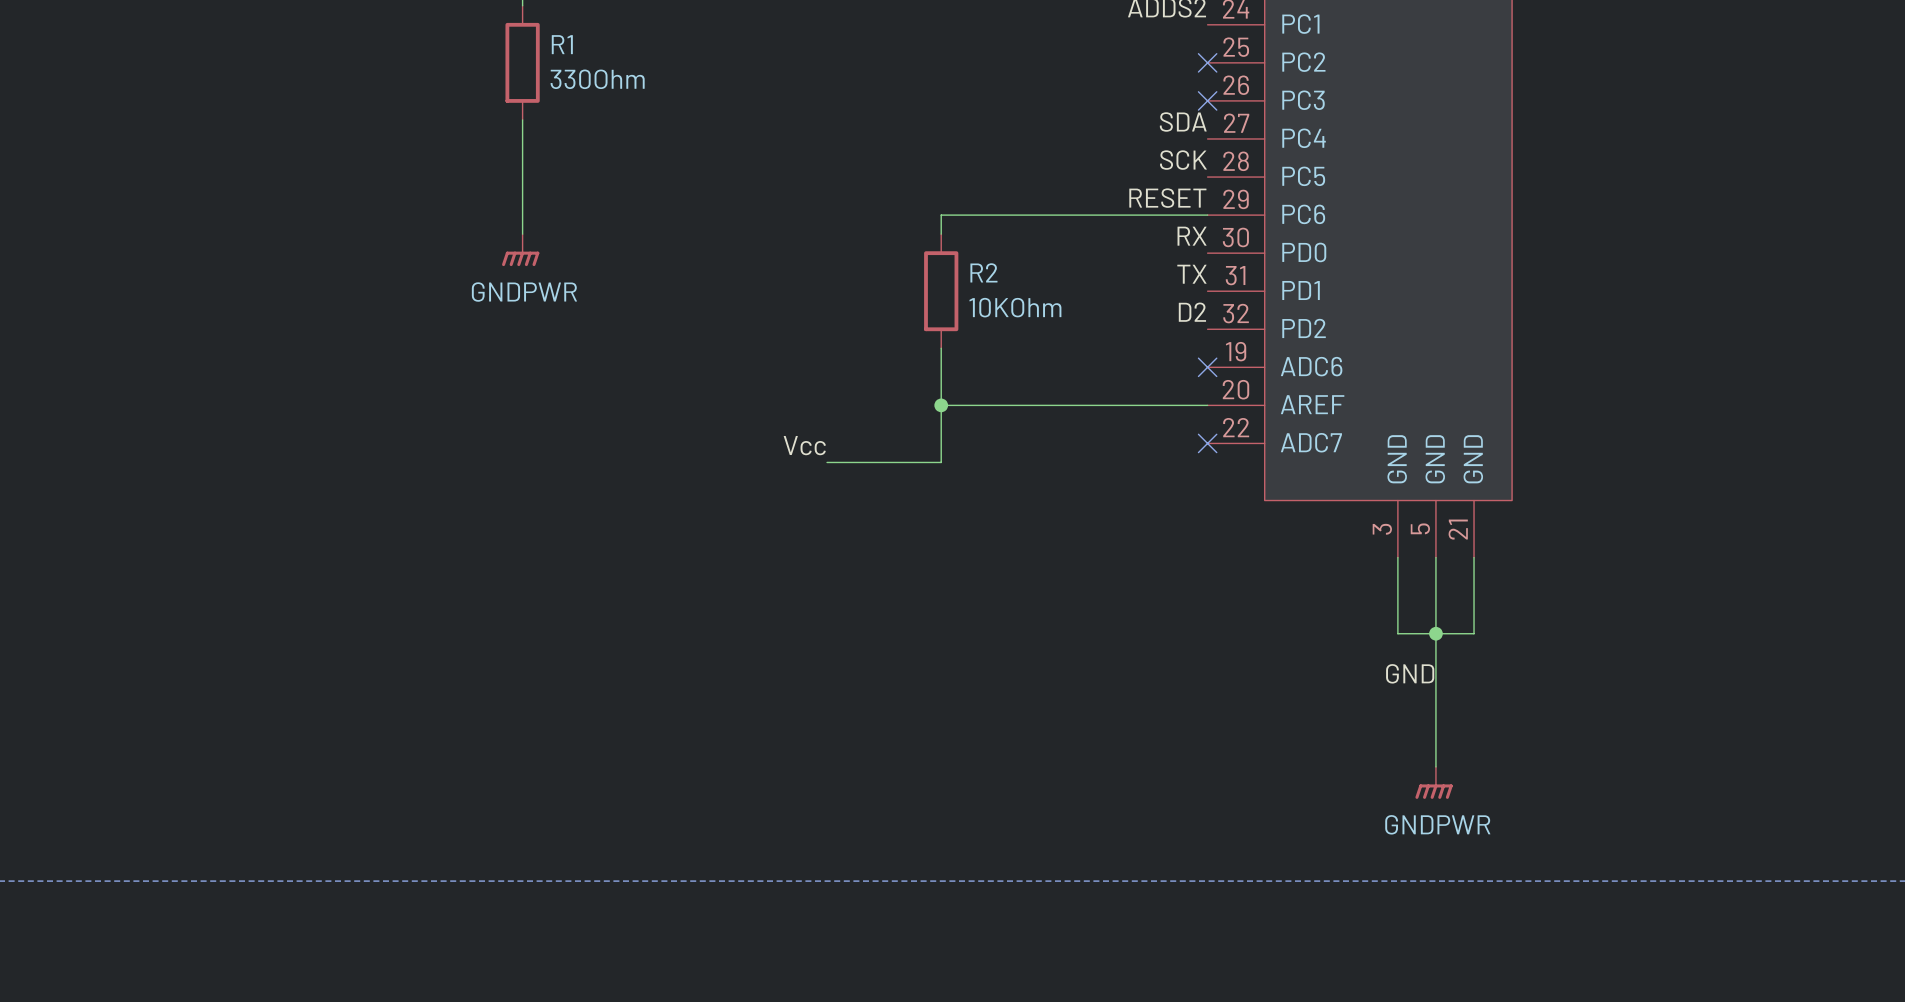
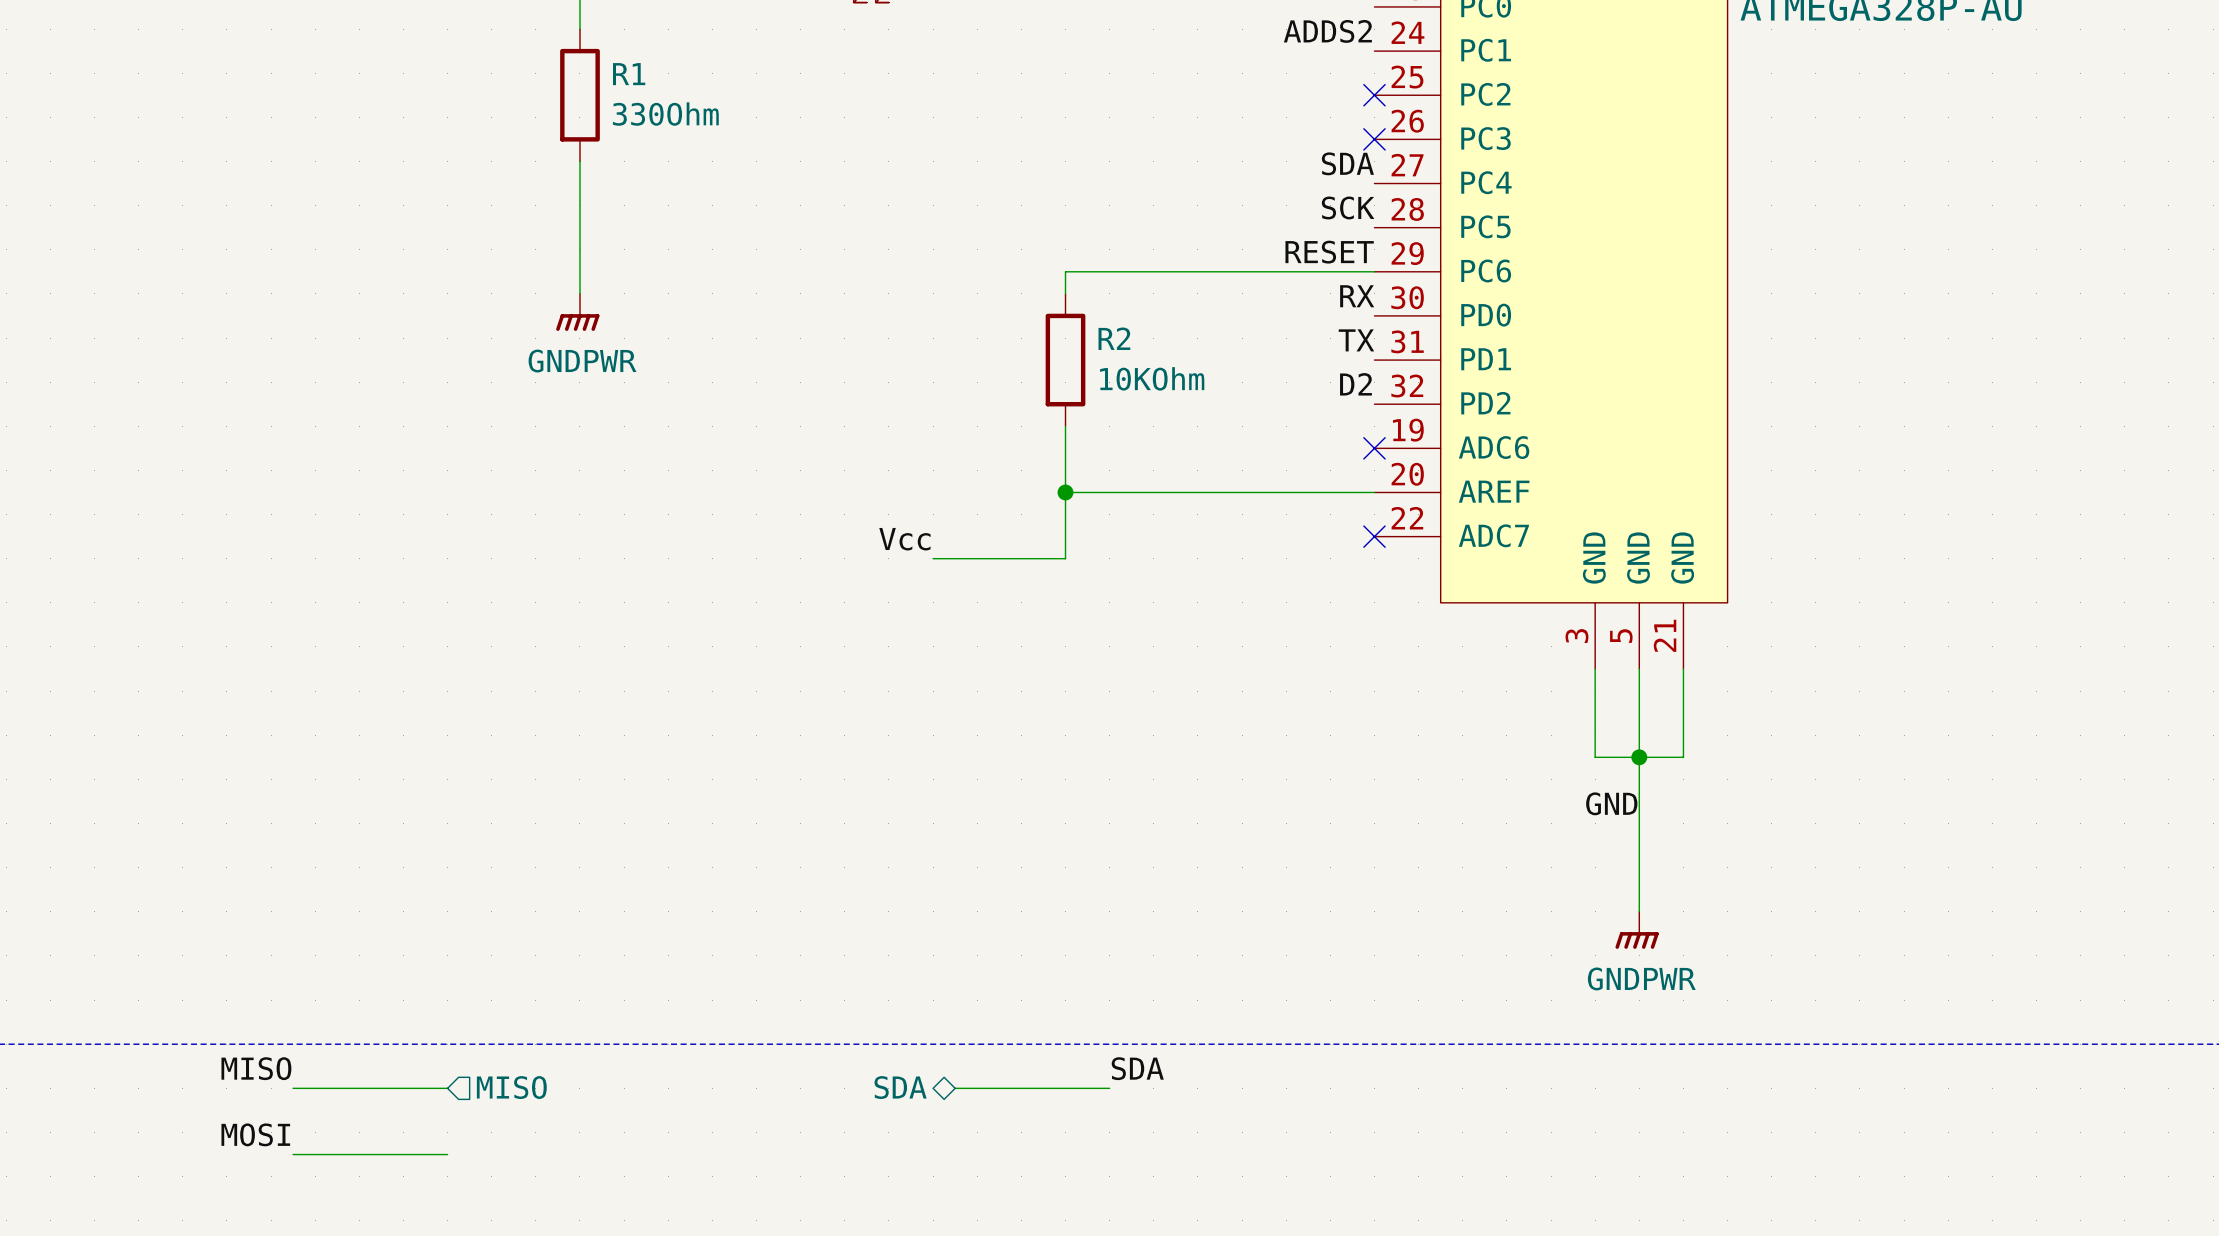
label: none -> MISO (256, 1068)
label: none -> SDA (1137, 1068)
sheet pin: none -> MISO (511, 1087)
sheet pin: none -> SDA (900, 1087)
wire: none -> (293, 1088) (447, 1088)
wire: none -> (955, 1088) (1109, 1088)
label: none -> MOSI (255, 1134)
wire: none -> (293, 1154) (447, 1154)

